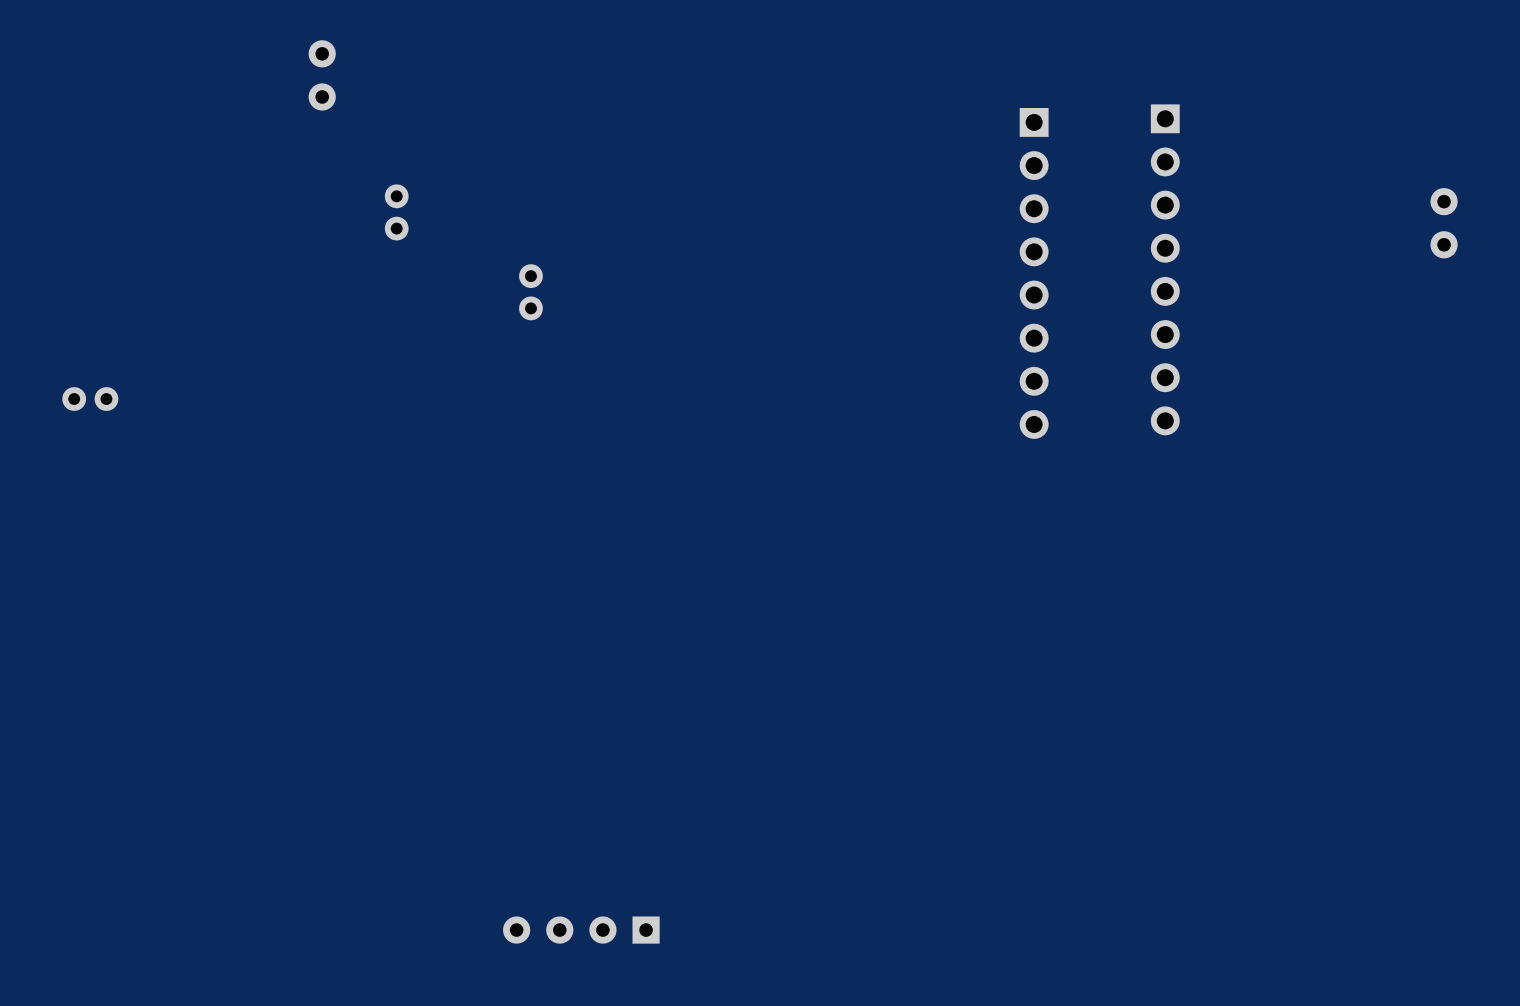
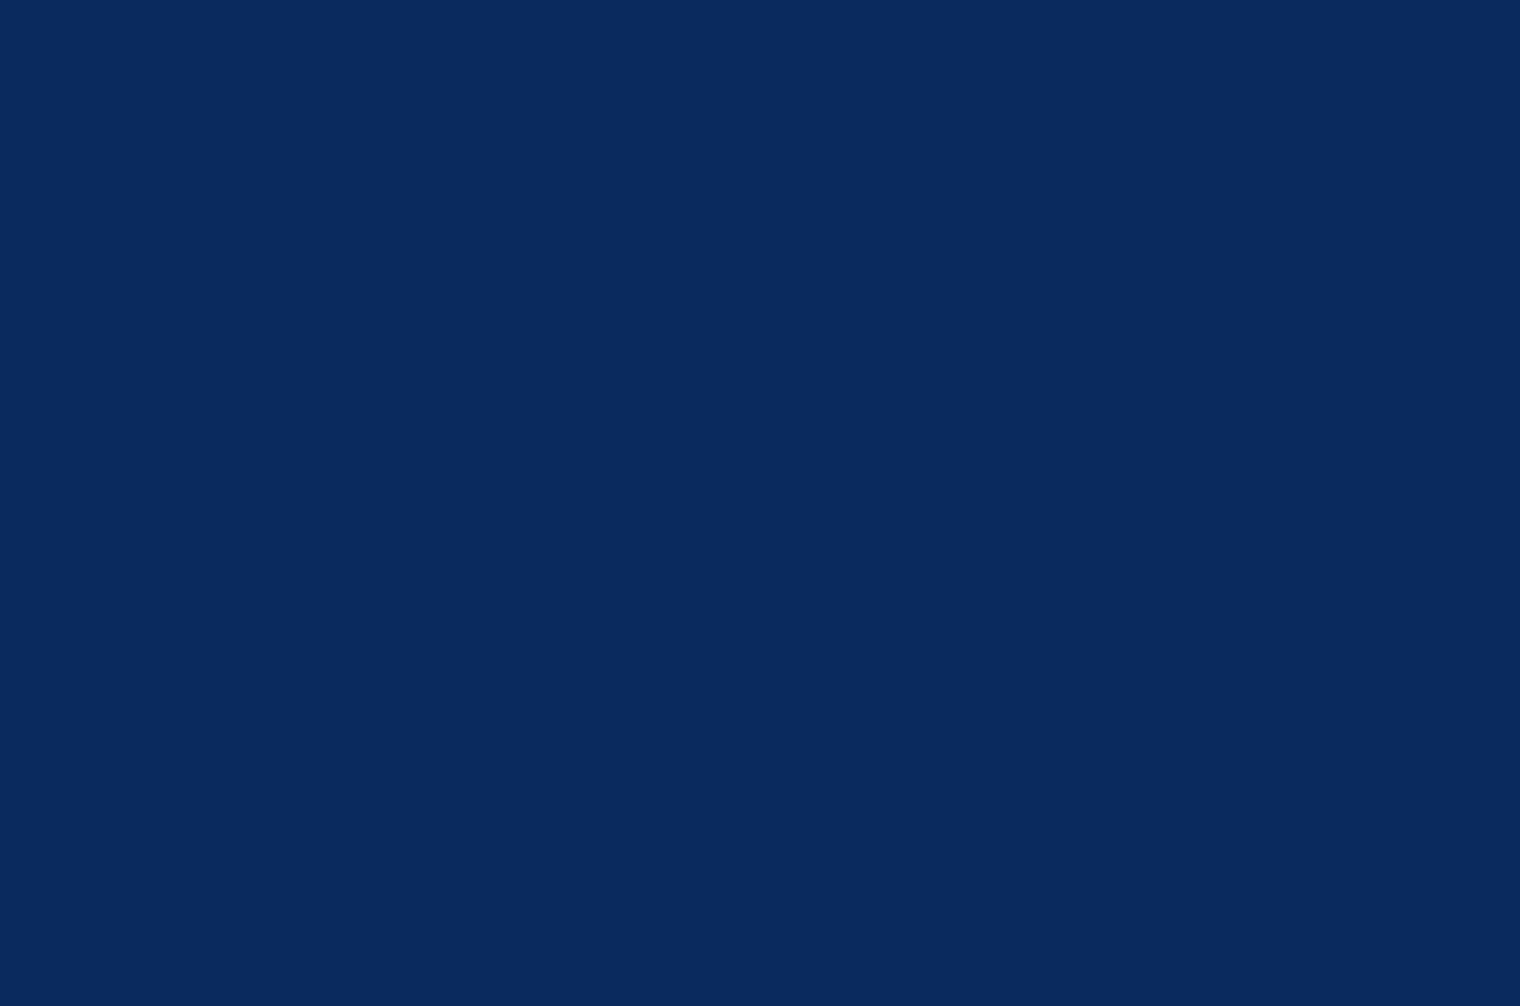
part: (322, 75) -> none
part: (396, 212) -> none
part: (1444, 223) -> none
part: (1165, 269) -> none
part: (1034, 273) -> none
part: (530, 292) -> none
part: (90, 399) -> none
part: (581, 930) -> none

